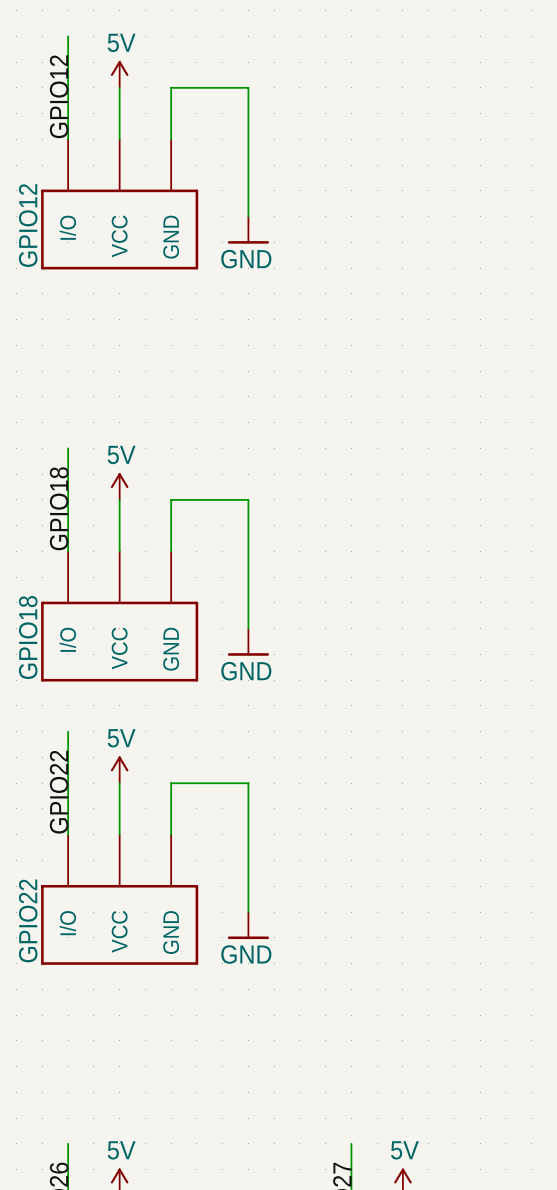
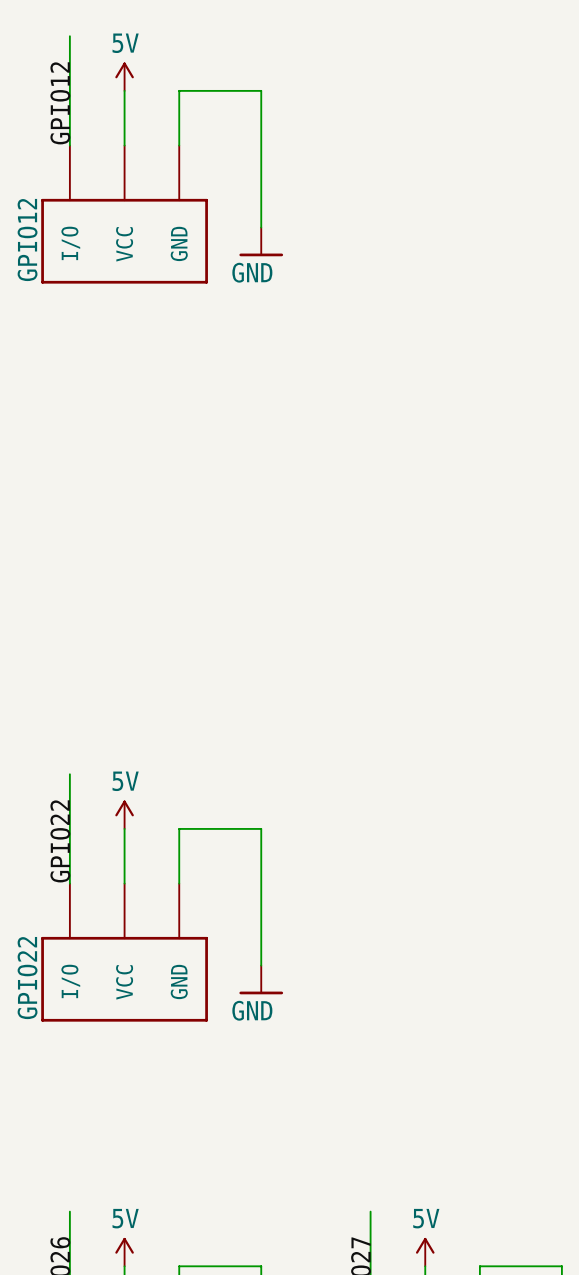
wire: (68, 448) (68, 551) -> none
power symbol: 5V (119, 486) -> none
wire: (119, 499) (119, 551) -> none
label: GPIO18 (59, 508) -> none
wire: (171, 551) (171, 499) (248, 499) (248, 628) -> none
GPIO18: (119, 616) -> none
power symbol: GND (248, 642) -> none

